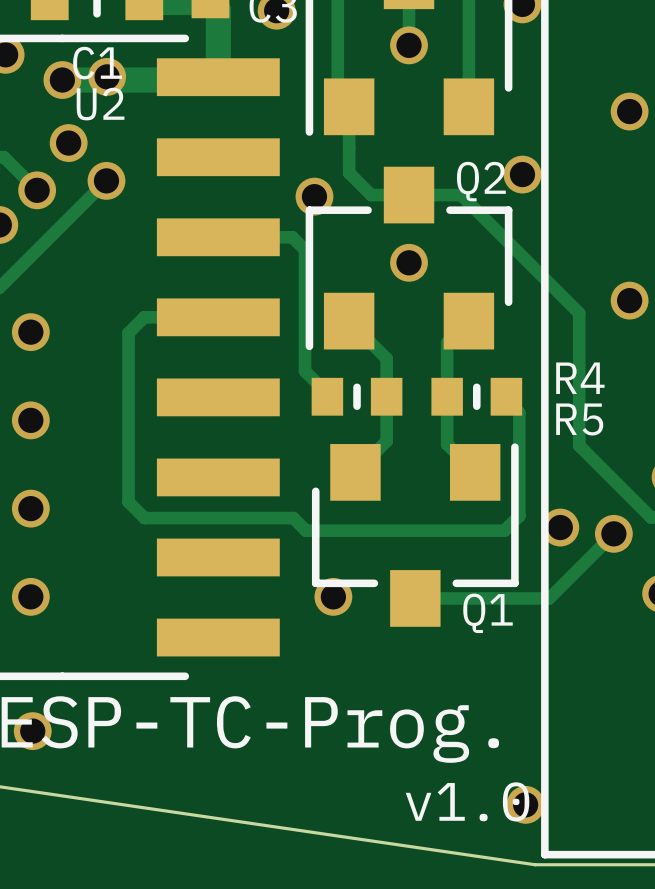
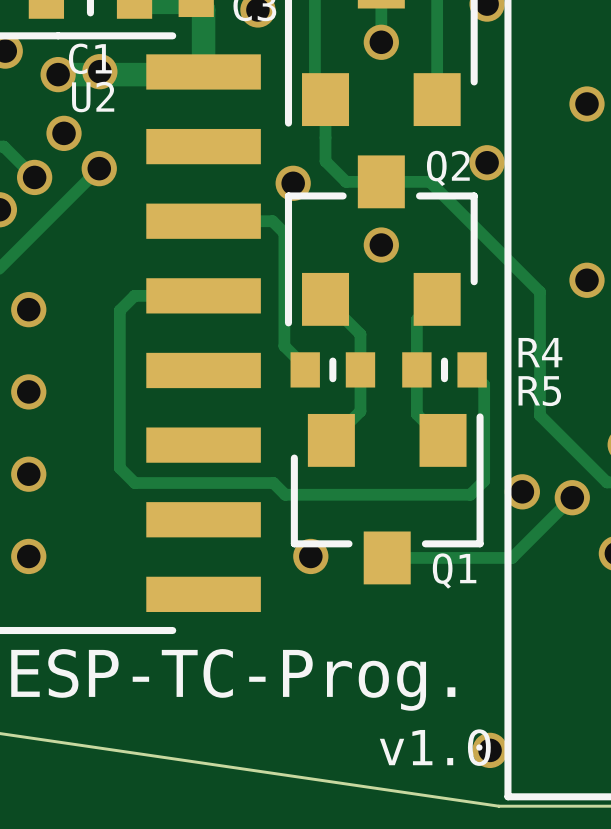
via: (32, 731) -> none

